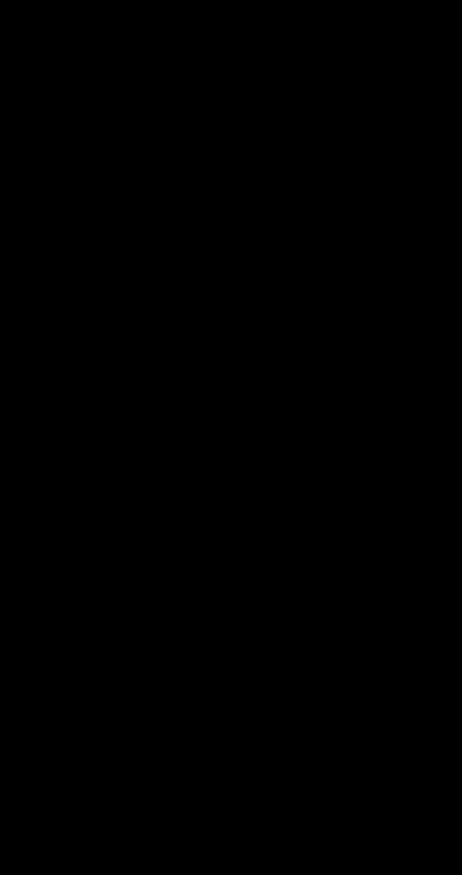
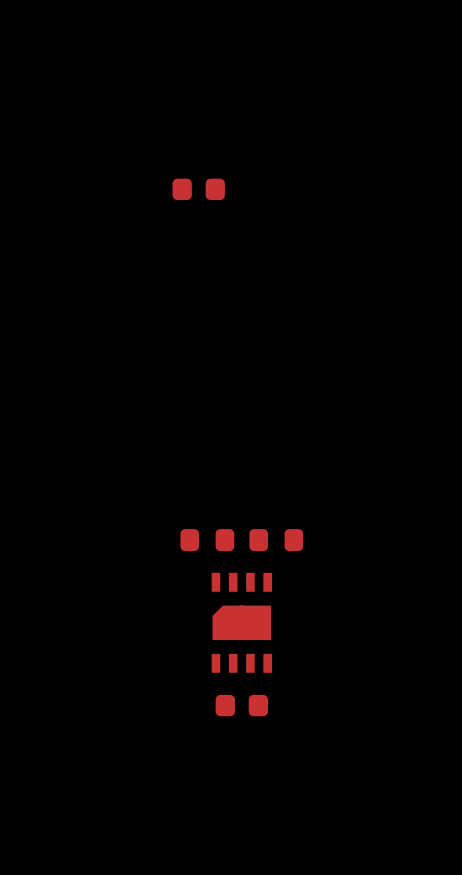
part: none -> (198, 189)
part: none -> (207, 540)
part: none -> (276, 540)
part: none -> (241, 622)
part: none -> (241, 705)

